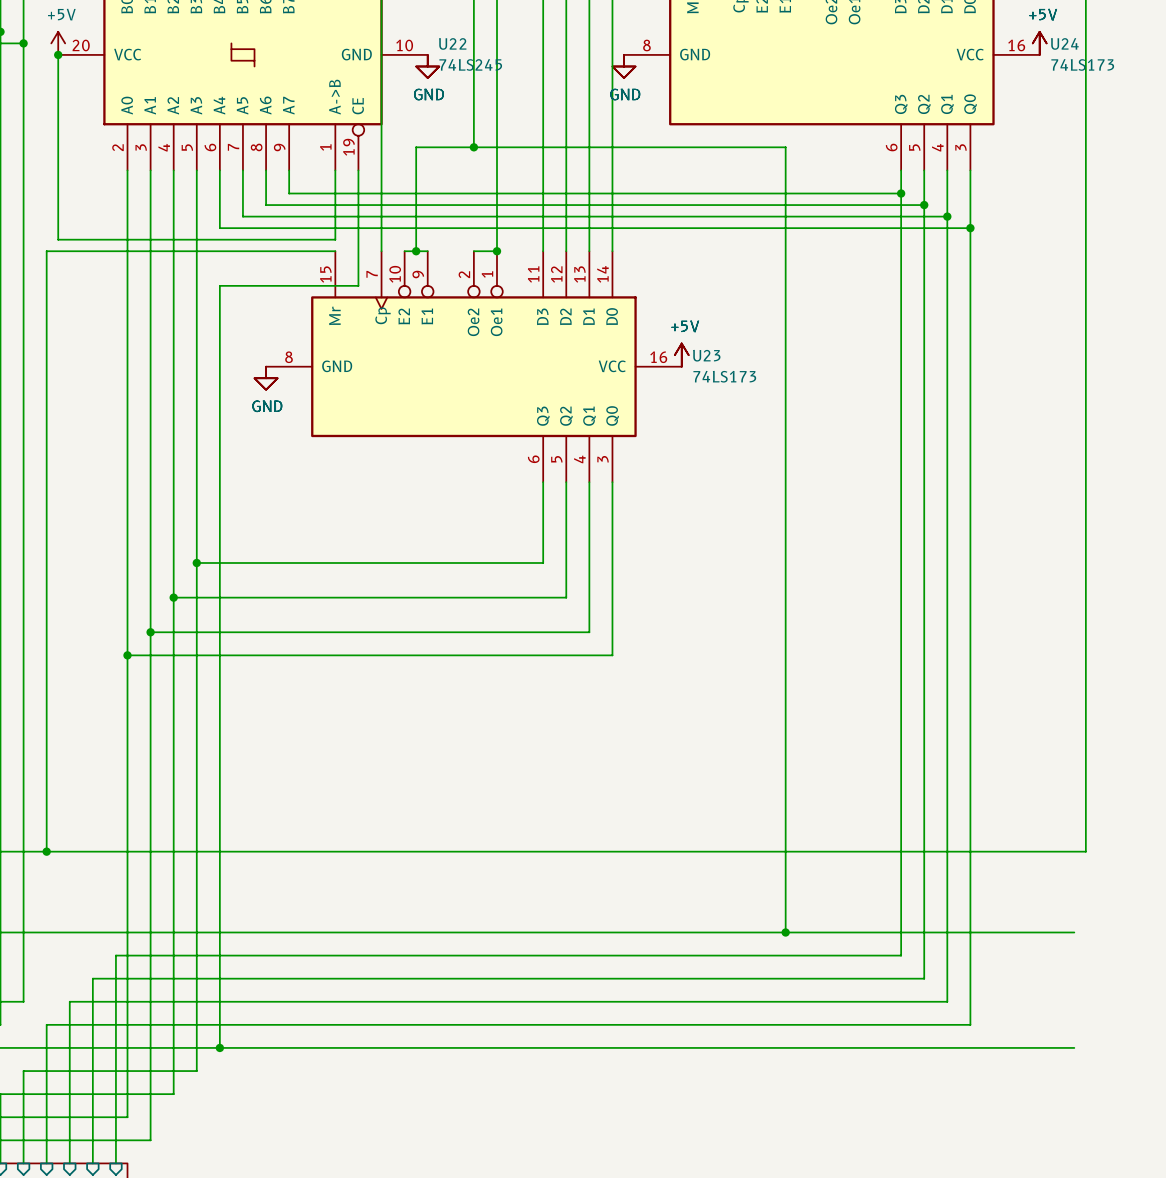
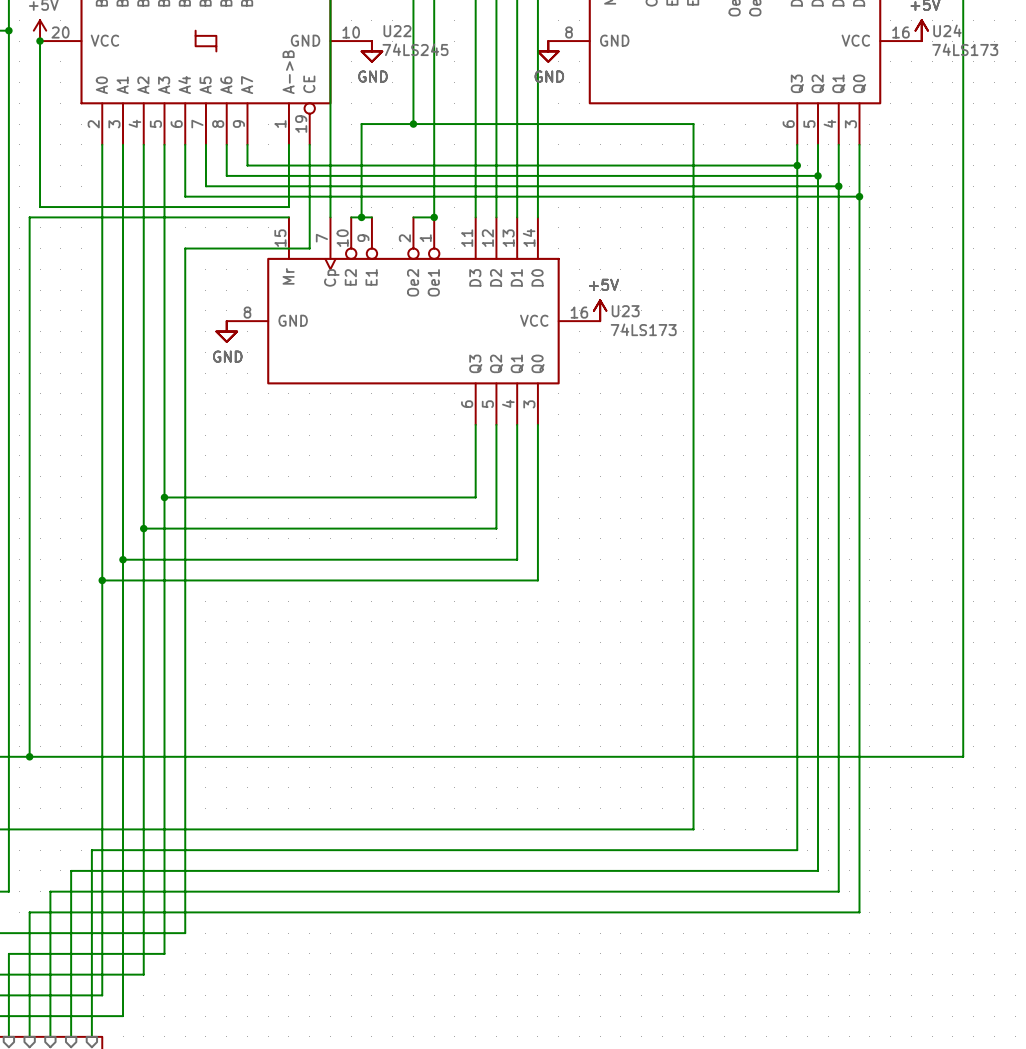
wire: (785, 932) (1074, 932) -> none
junction: (785, 932) -> none
wire: (219, 1047) (1074, 1047) -> none
junction: (219, 1047) -> none

